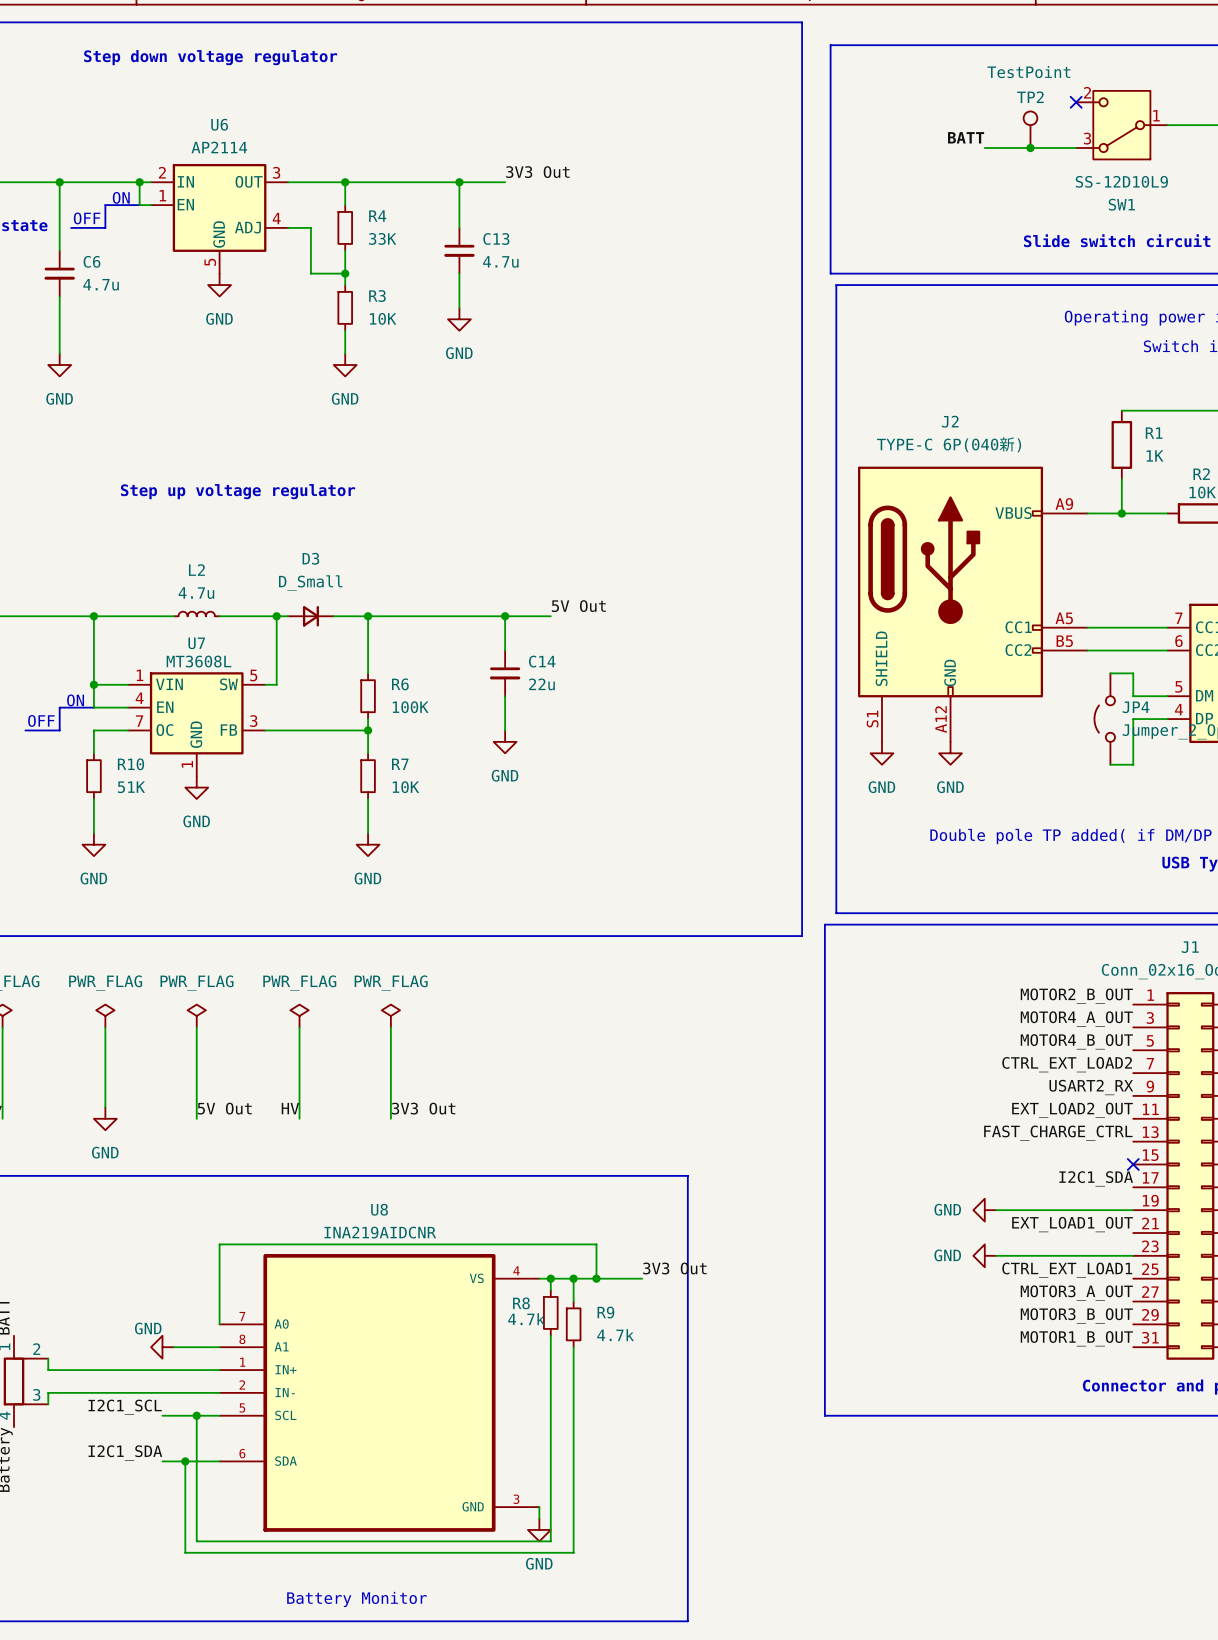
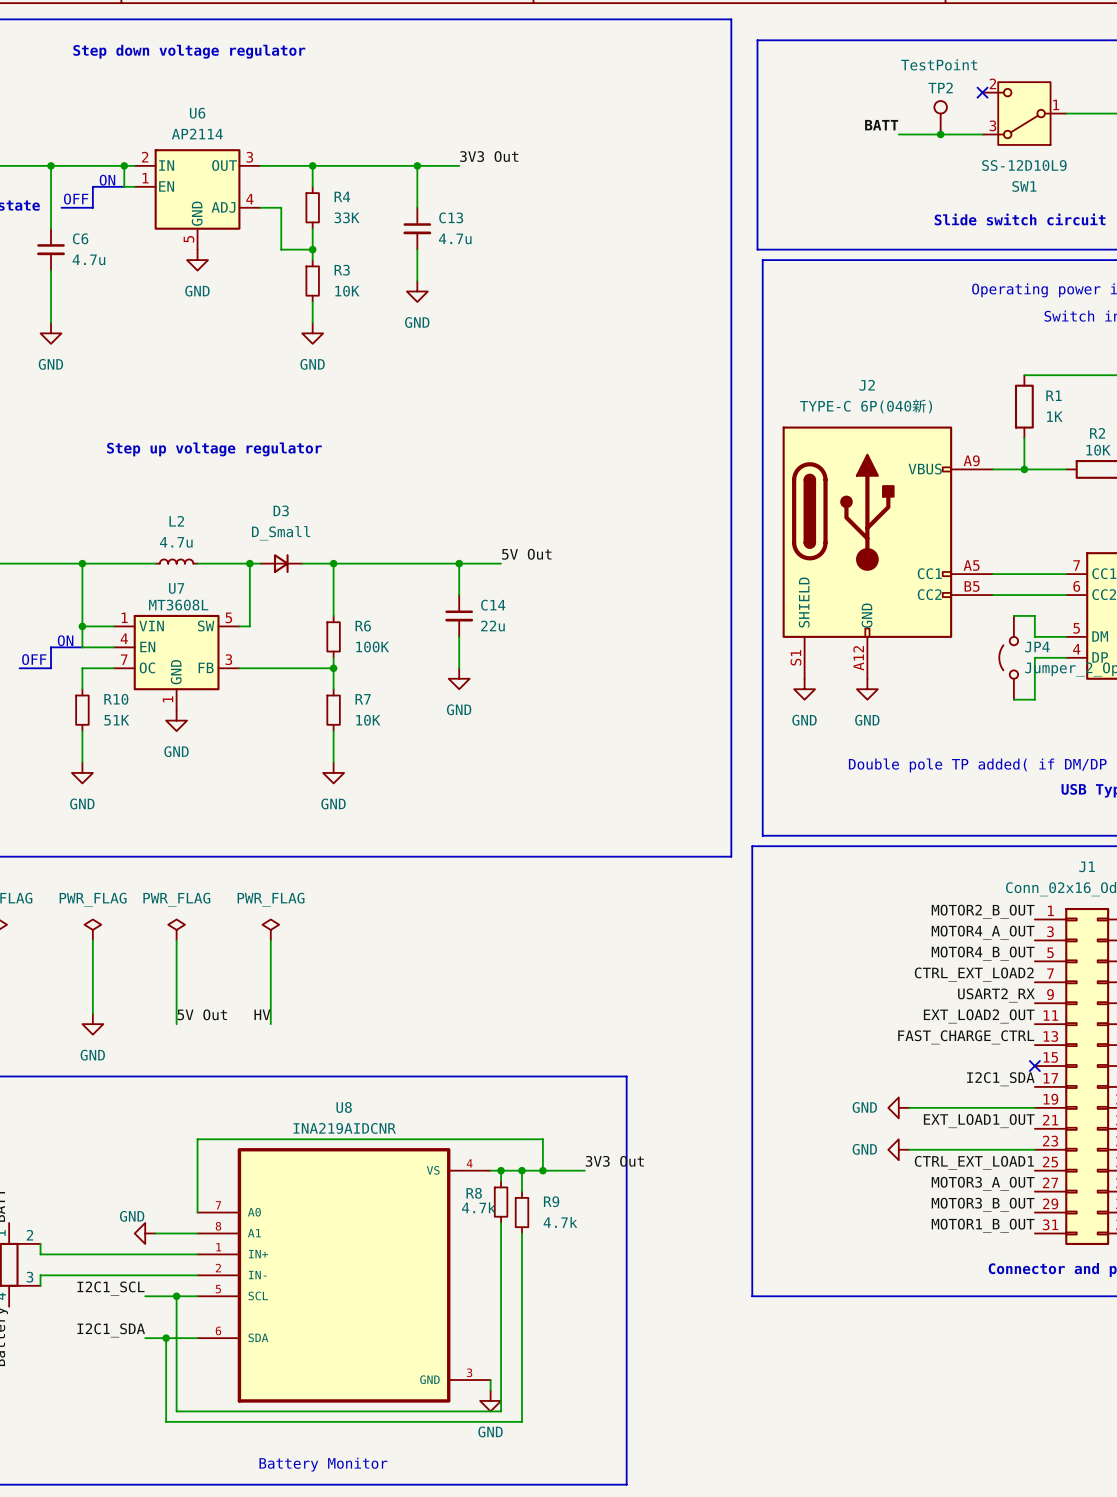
power symbol: PWR_FLAG (390, 1016) -> none
wire: (390, 1027) (390, 1118) -> none
label: 3V3 Out (423, 1108) -> none

